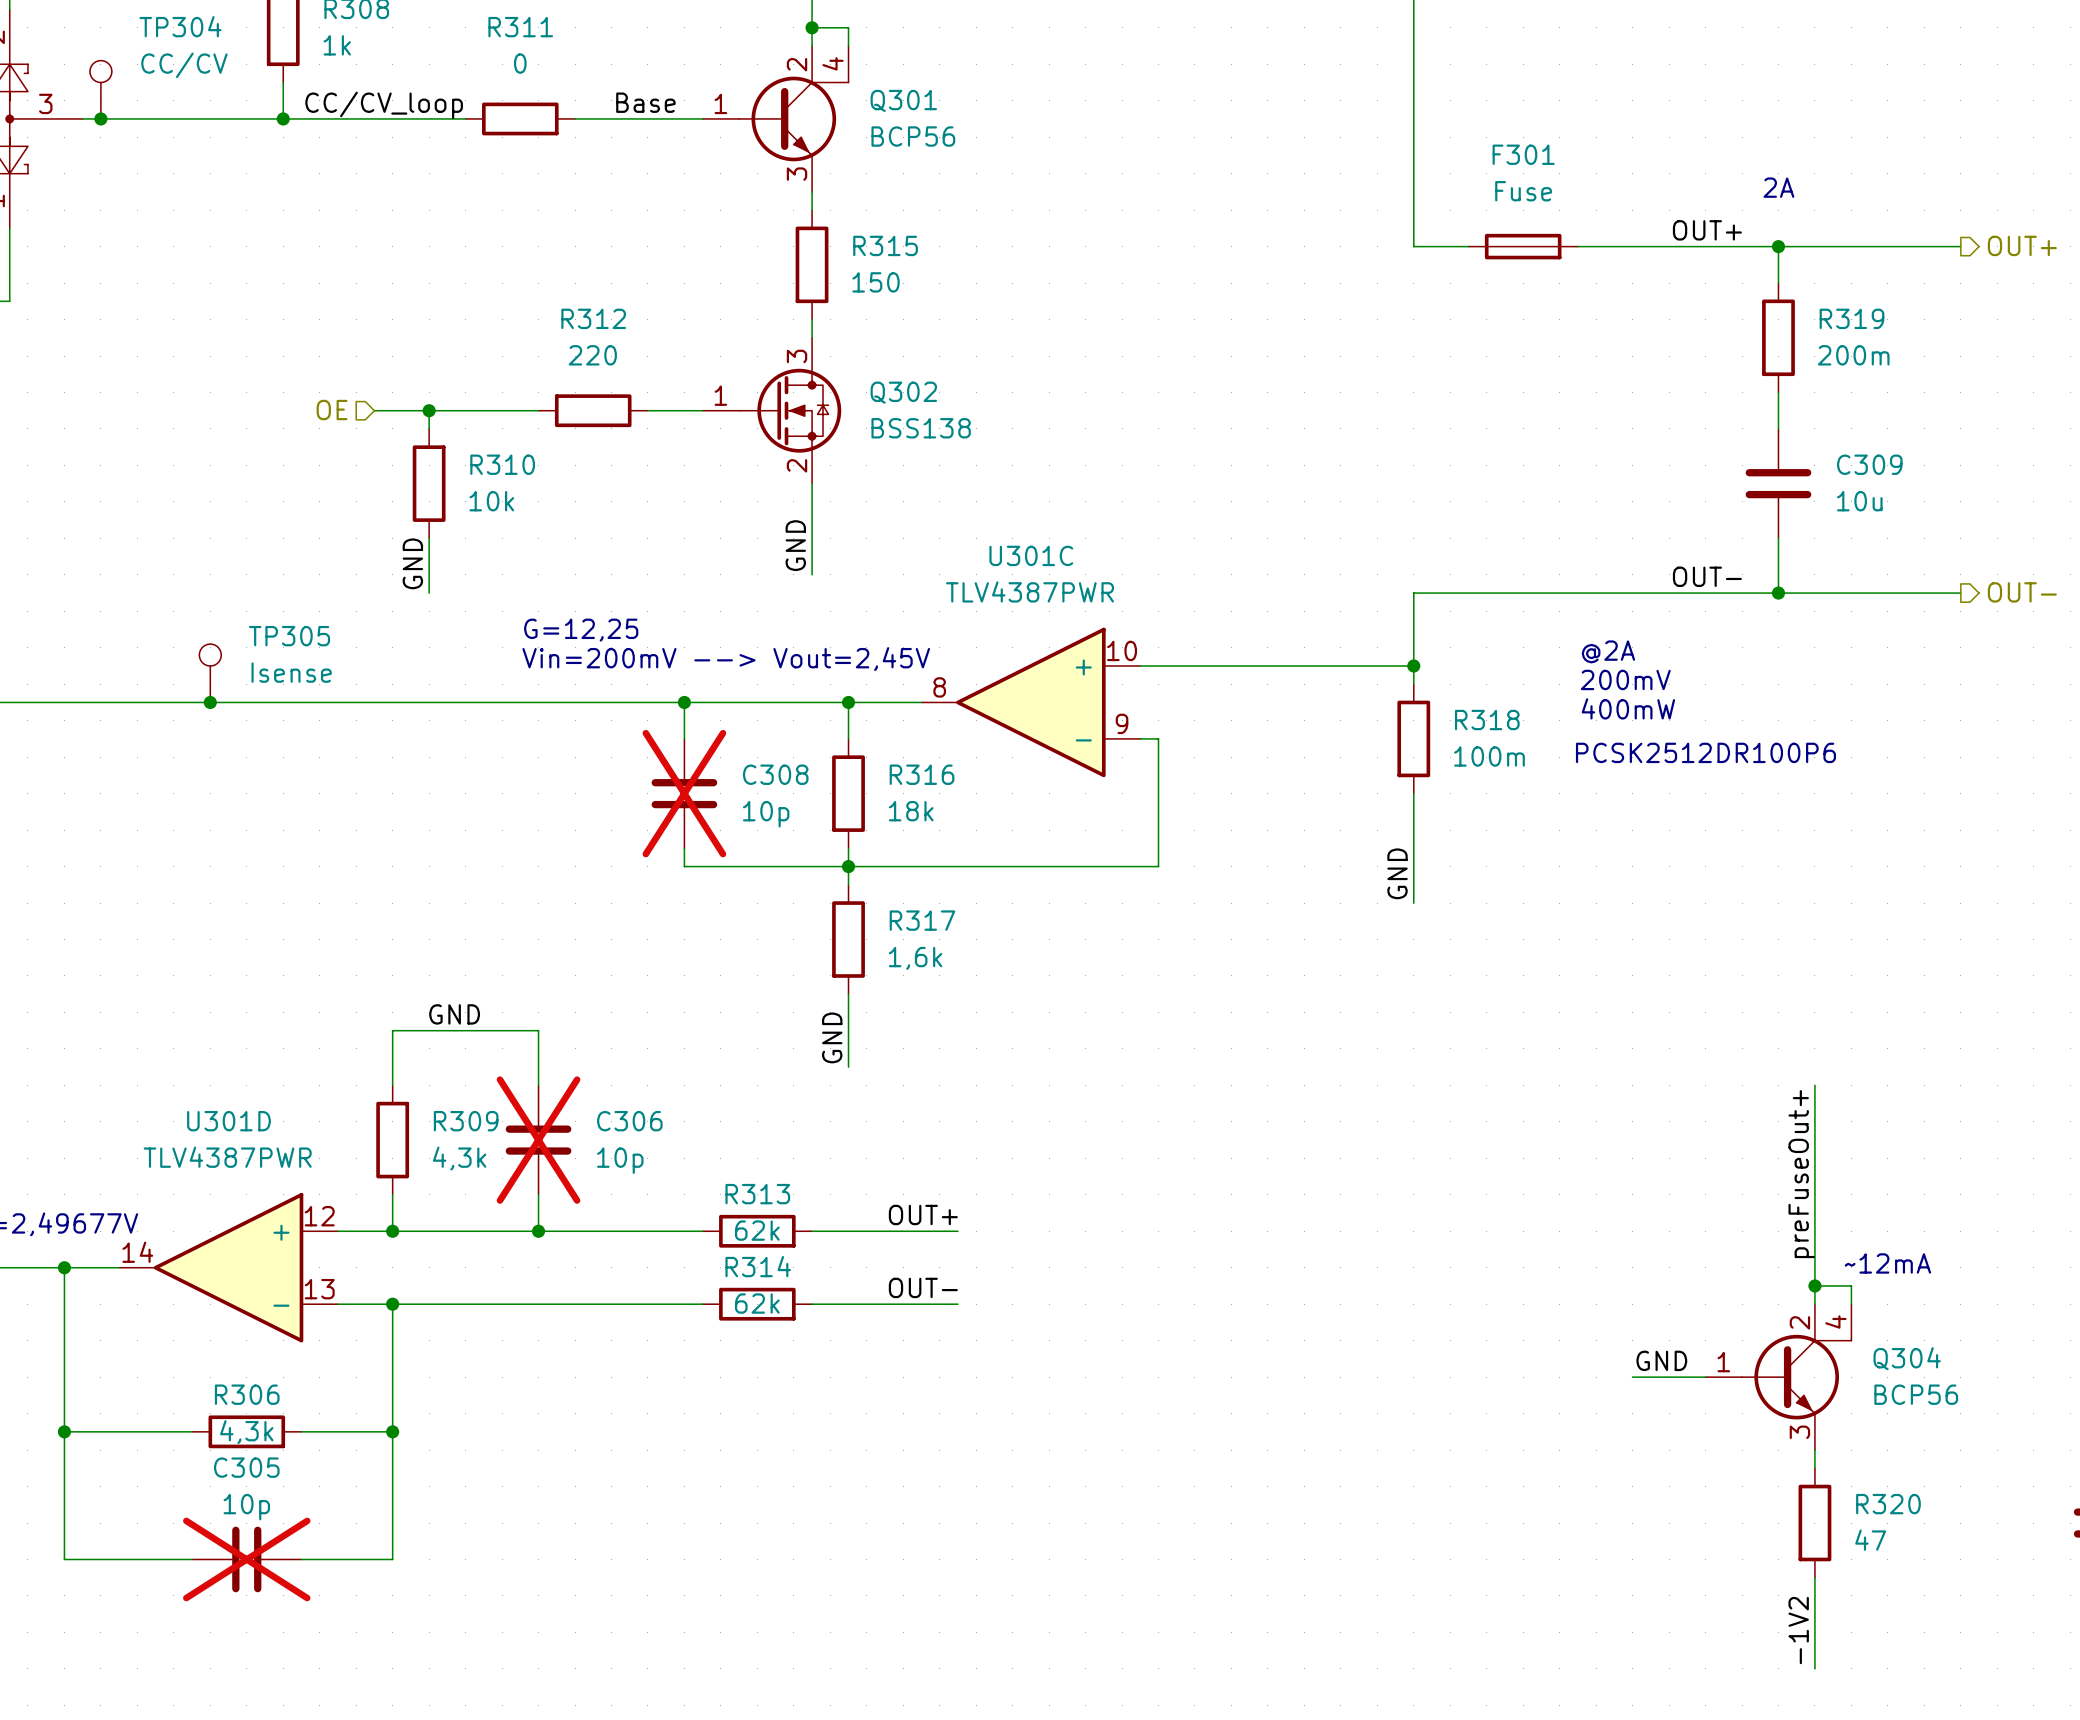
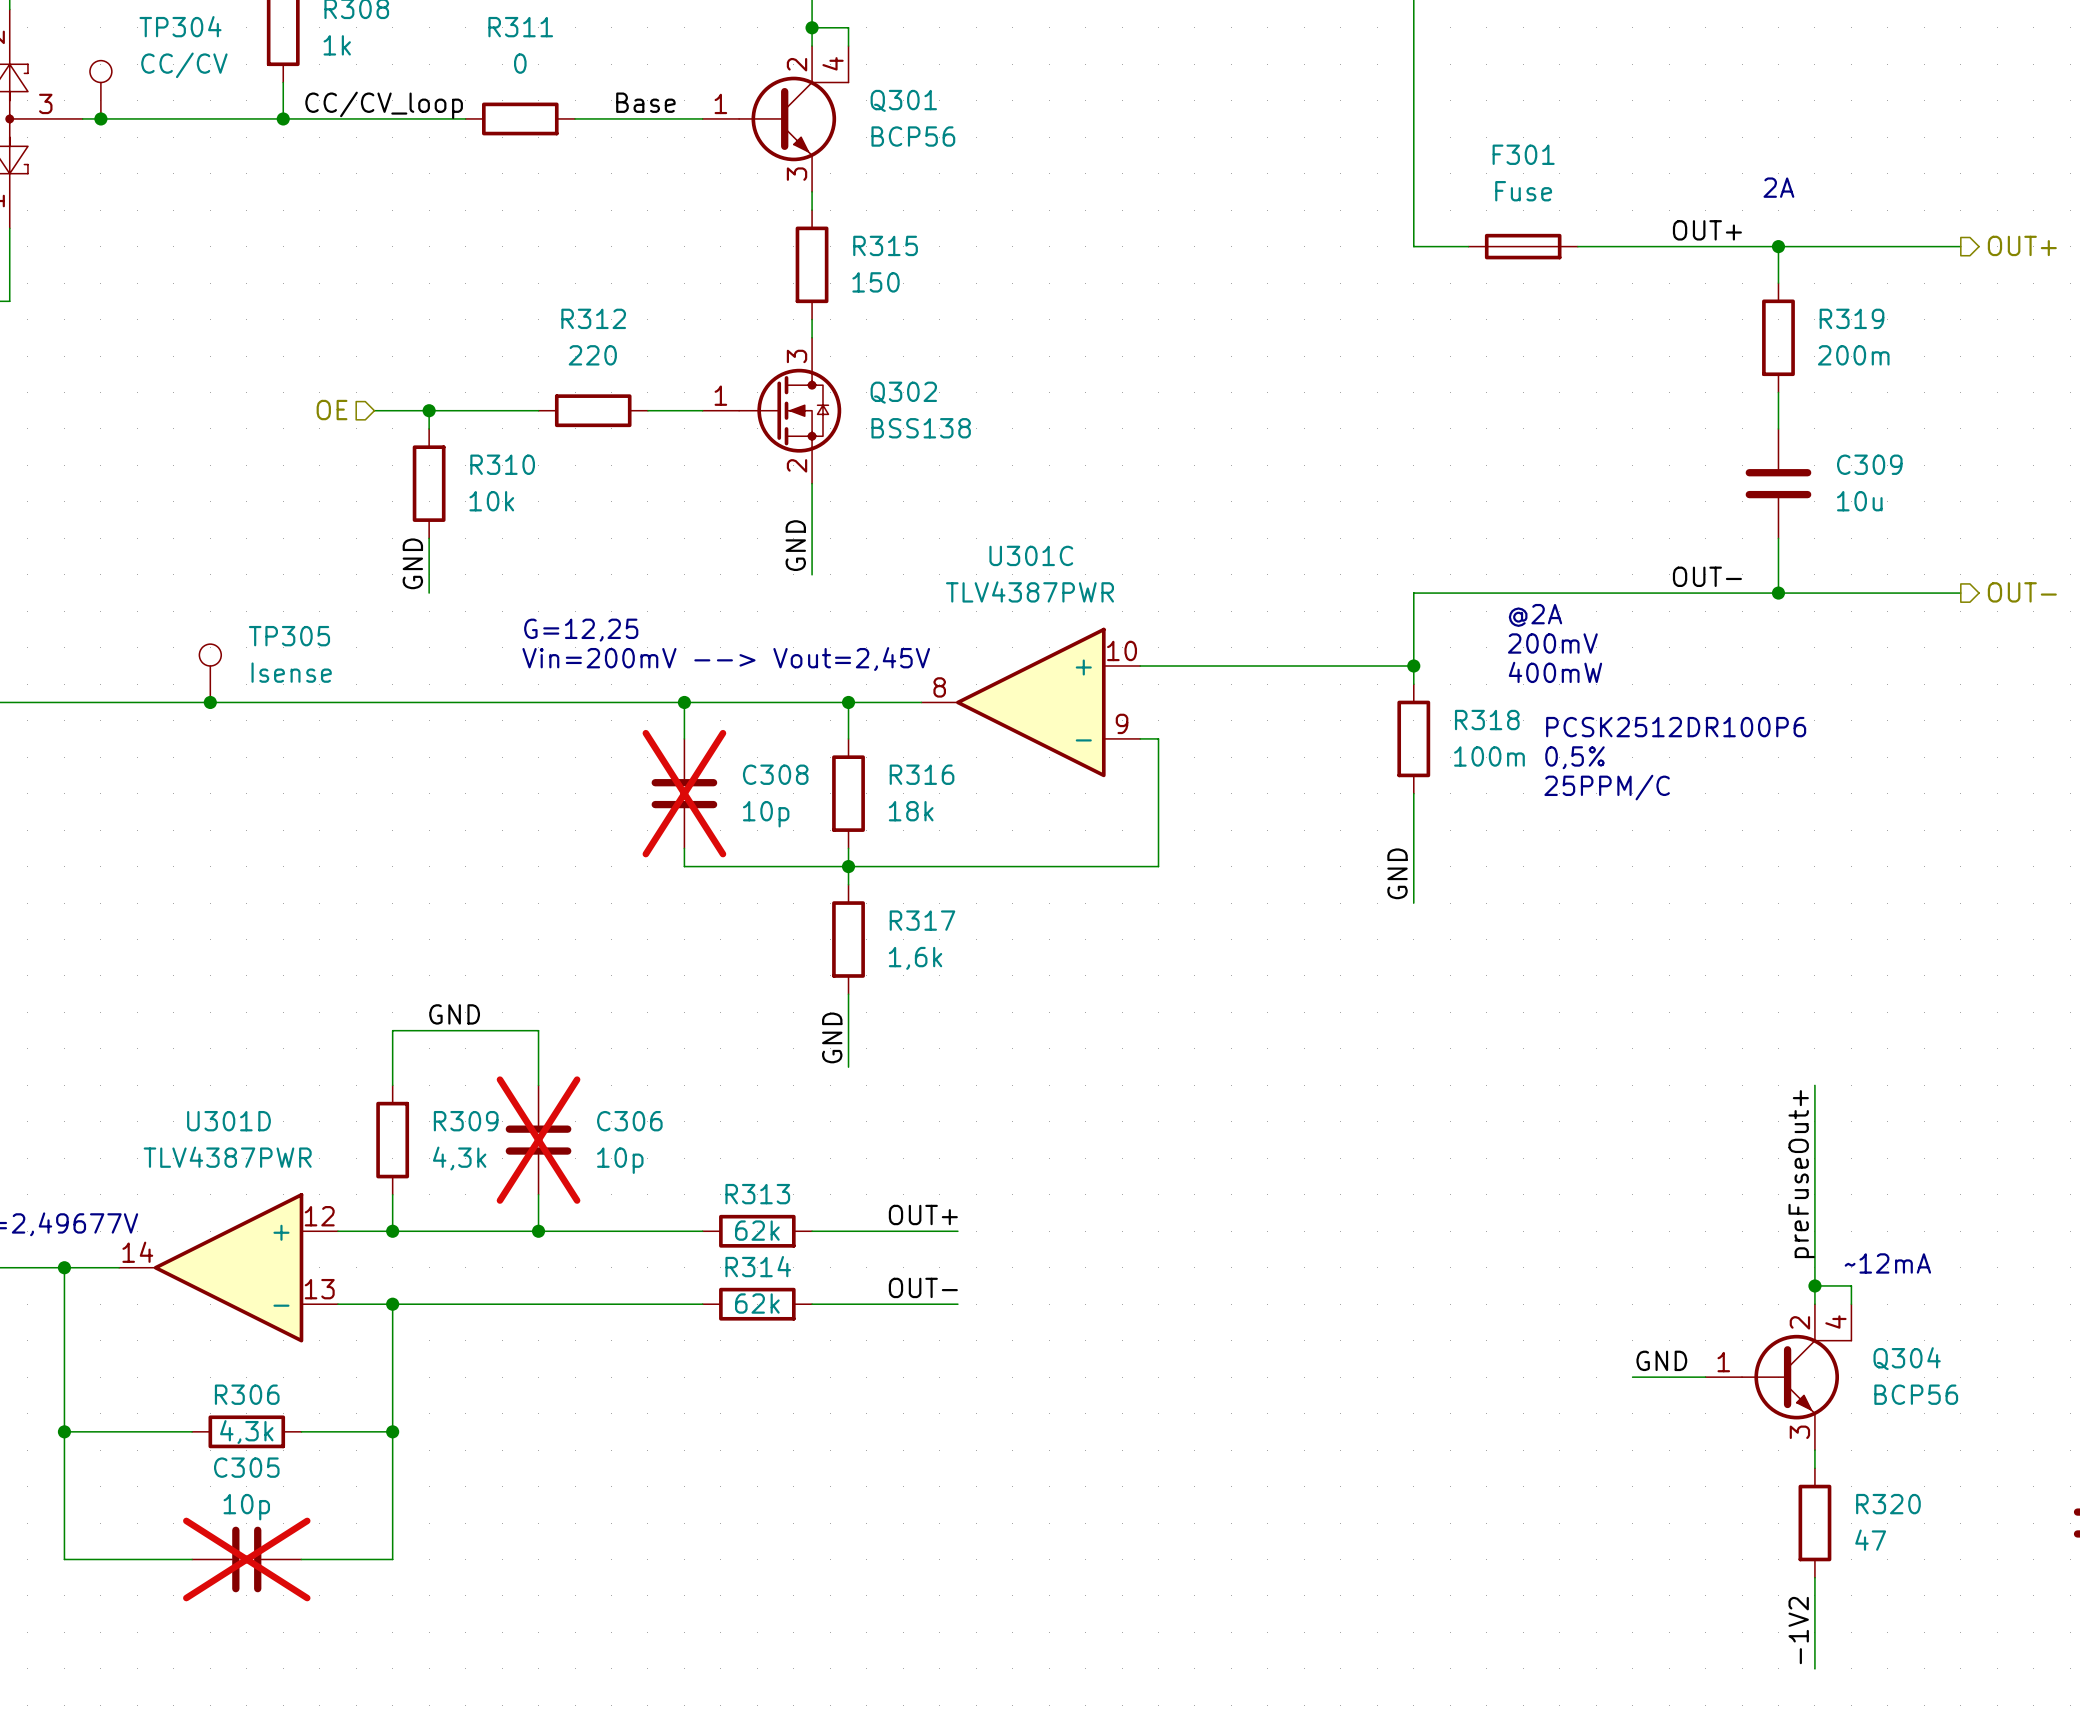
text position: @2A (1608, 651) -> @2A (1535, 615)
text position: 200mV (1625, 679) -> 200mV (1552, 643)
text position: 400mW (1628, 708) -> 400mW (1555, 672)
text position: PCSK2512DR100P6 (1705, 752) -> PCSK2512DR100P6 (1676, 727)
text: none -> 0,5% (1574, 757)
text: none -> 25PPM/C (1607, 787)

